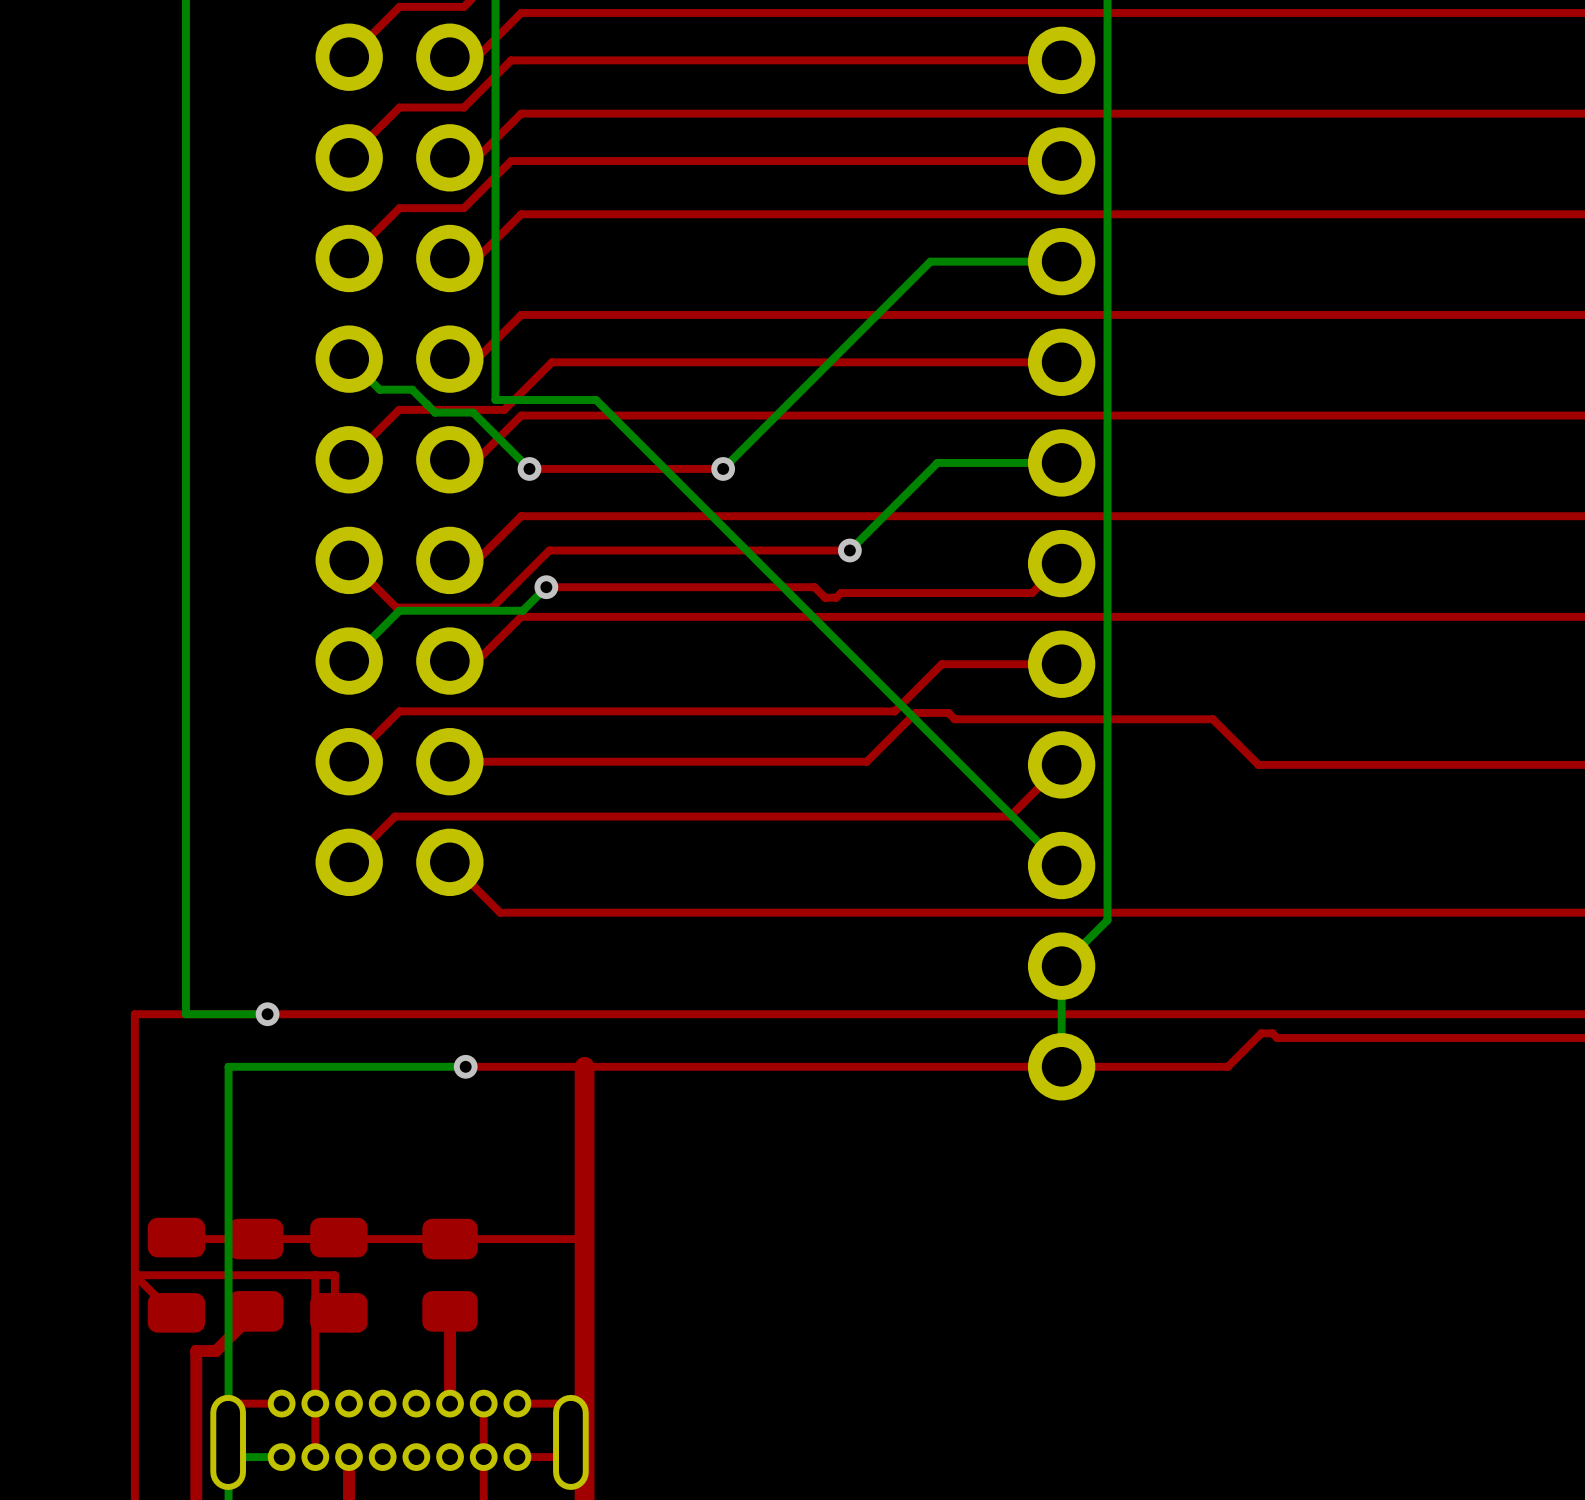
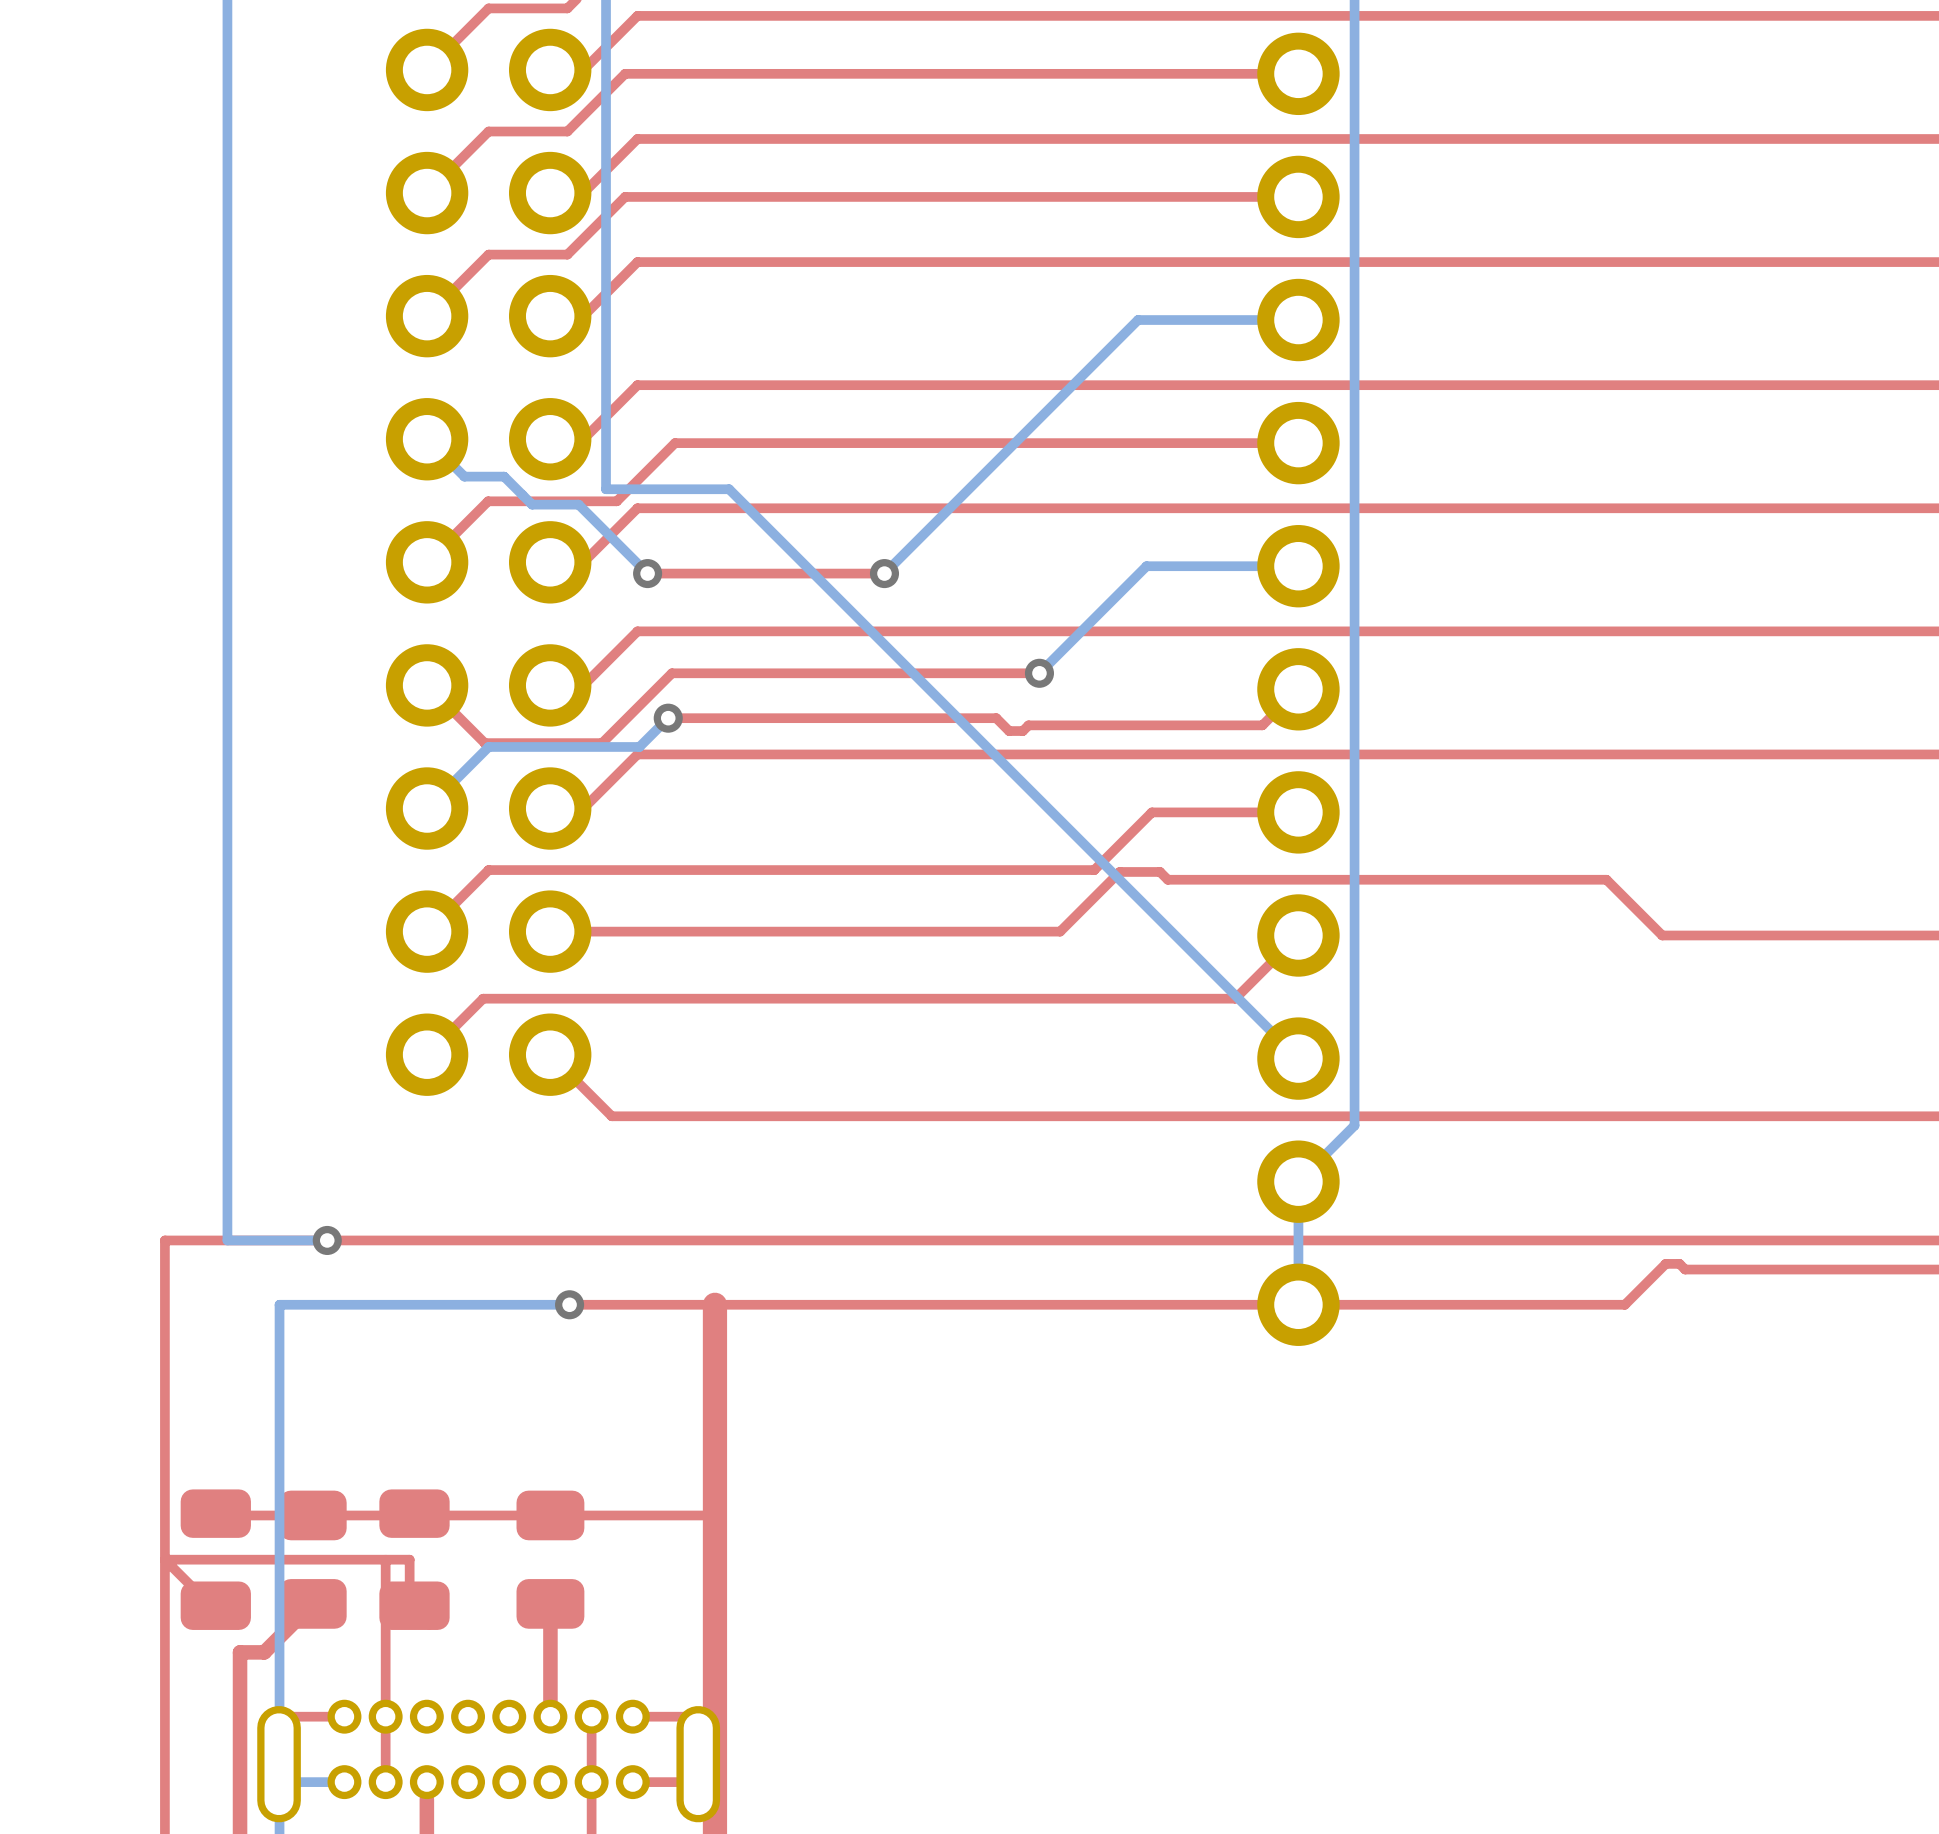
top track: (1212, 719) (1258, 764) (1359, 764) -> (1483, 879) (1606, 879) (1662, 935)
top track: (1377, 1037) (1277, 1037) (1272, 1033) (1261, 1033) (1227, 1066) -> (1685, 1269) (1679, 1263) (1665, 1263) (1624, 1304) (1501, 1304)

